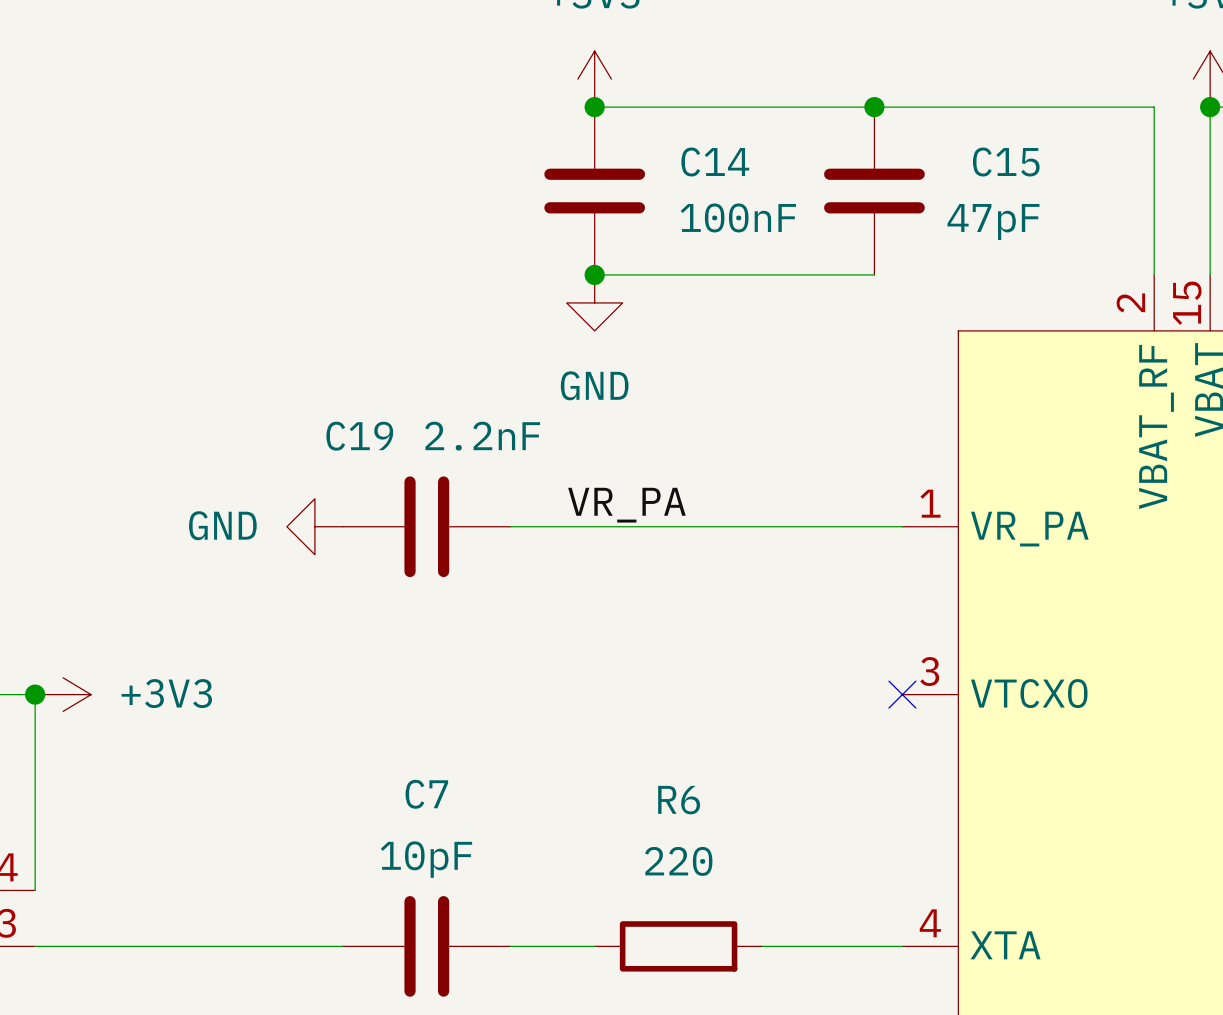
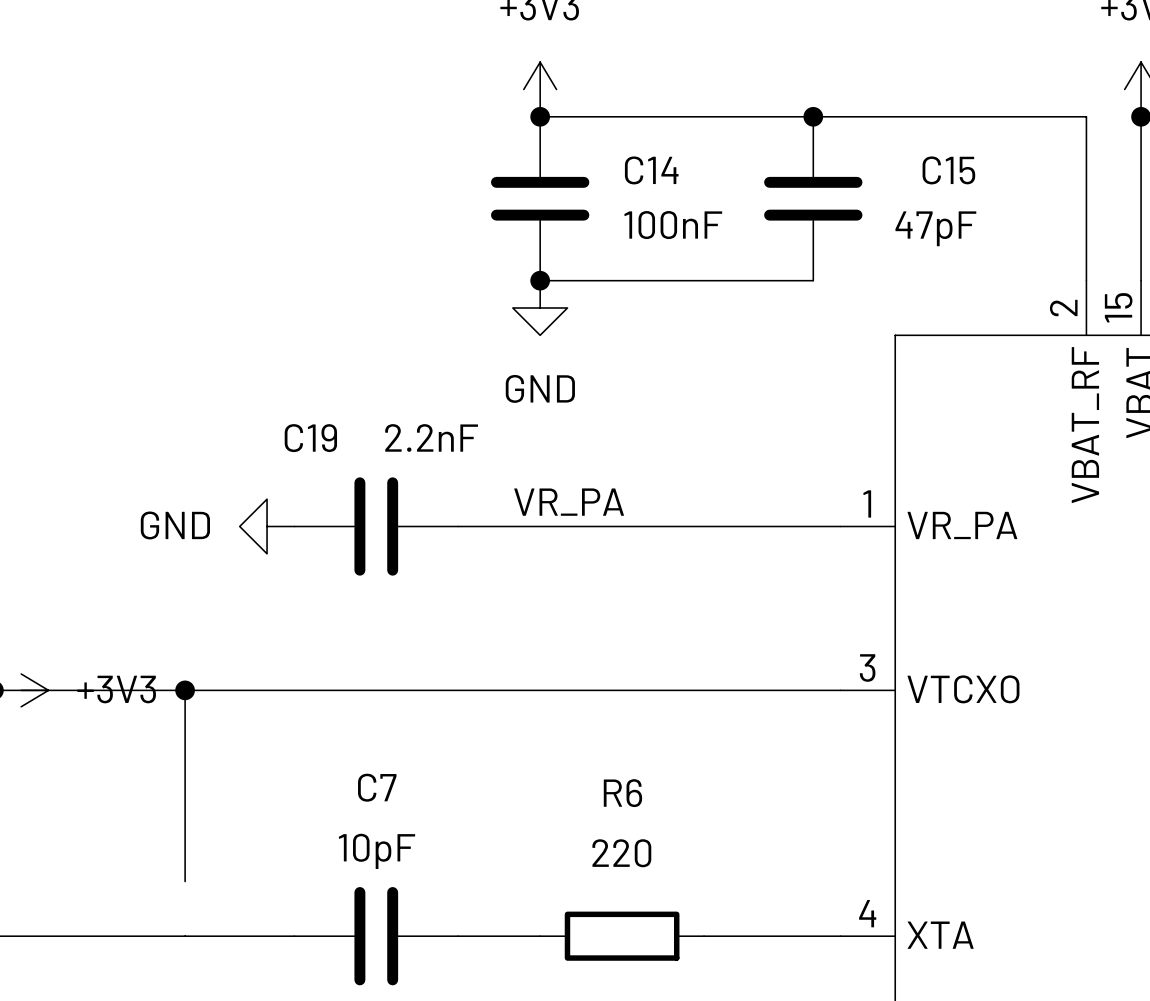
wire: none -> (21, 690) (840, 690)
wire: none -> (185, 690) (185, 881)
junction: none -> (185, 690)
no-connect mark: (902, 694) -> none

